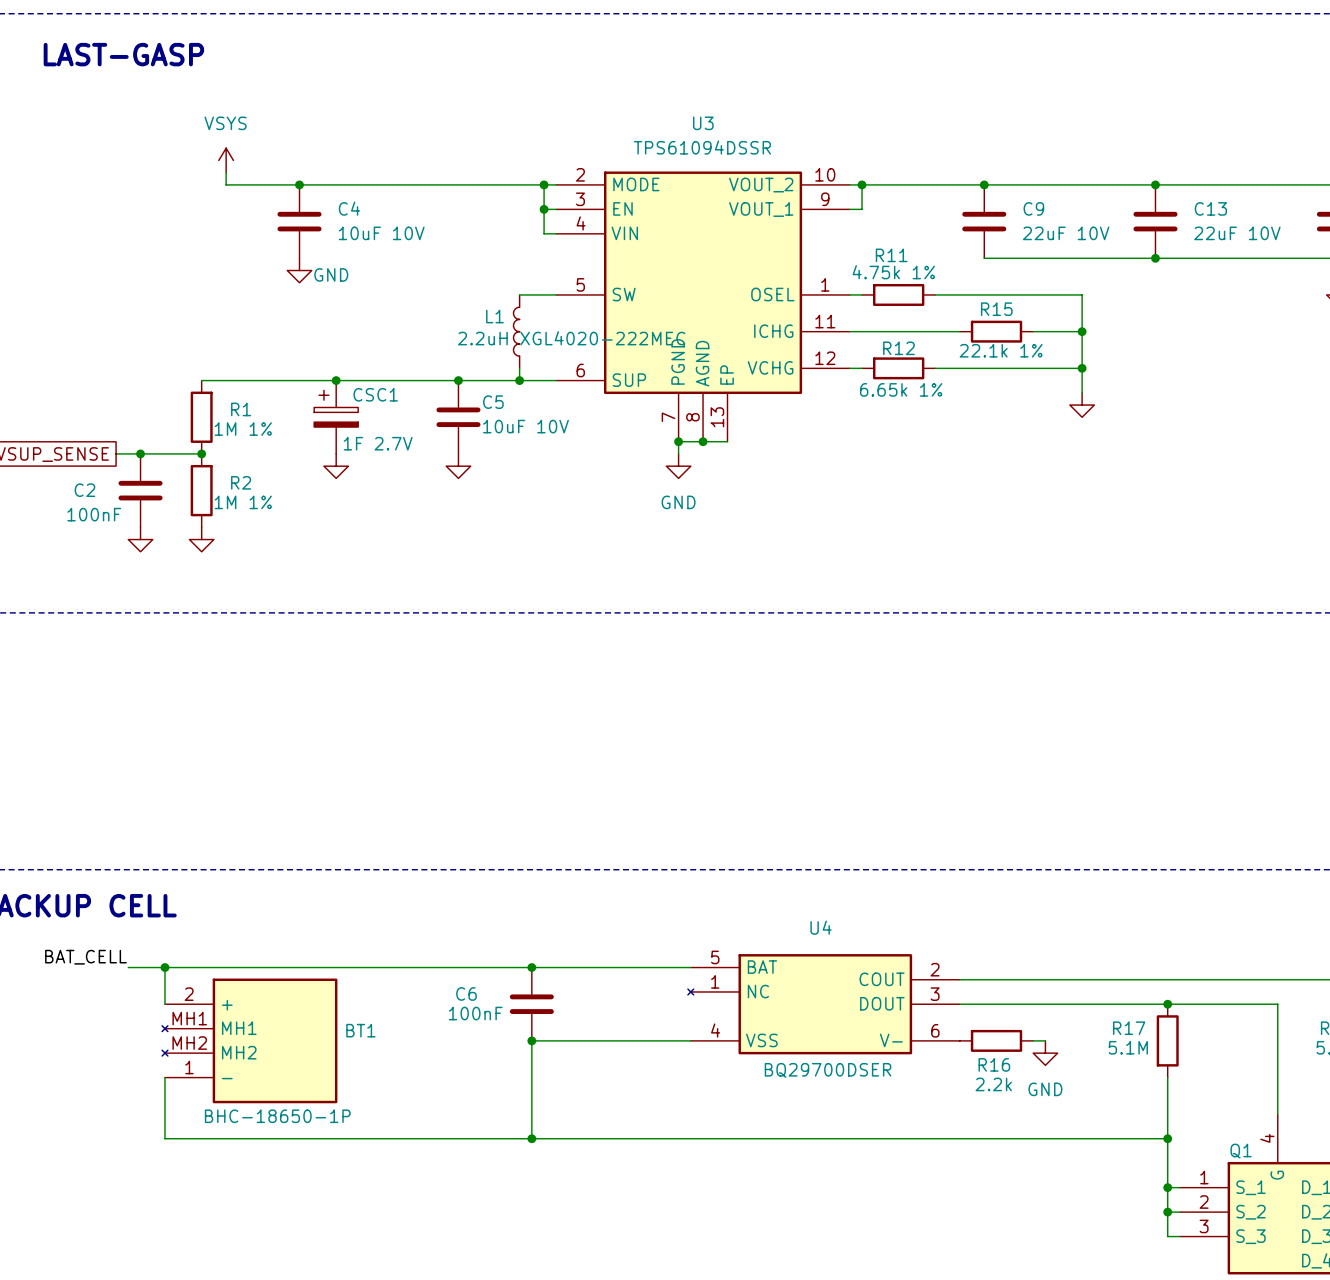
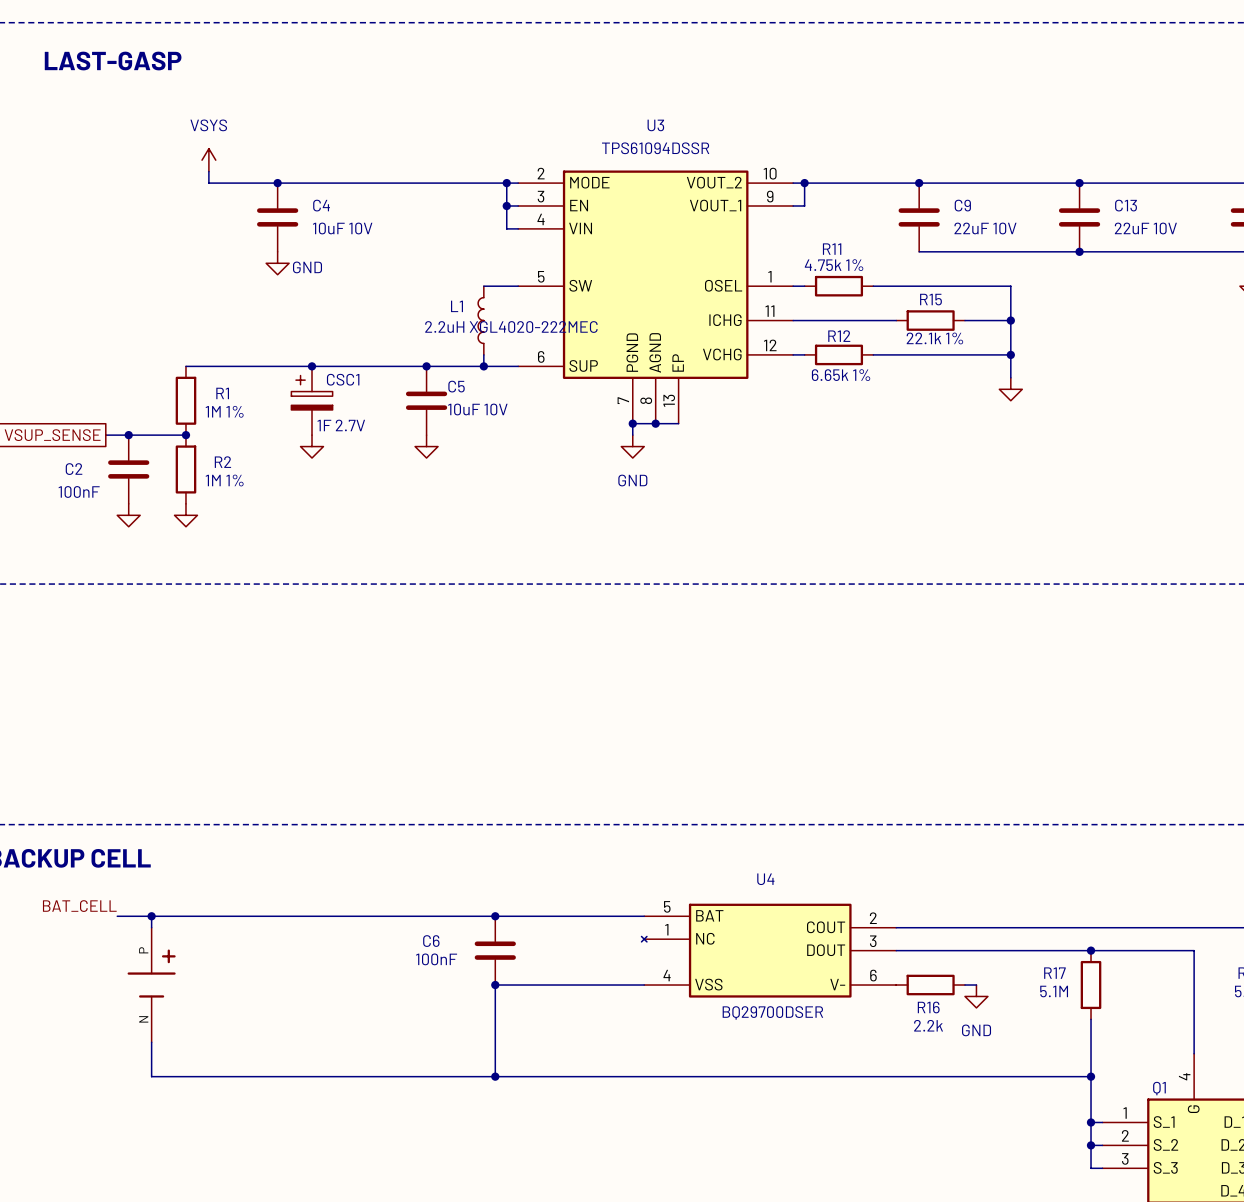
part: none -> (151, 985)
BT1: BHC-18650-1P (249, 1040) -> none

